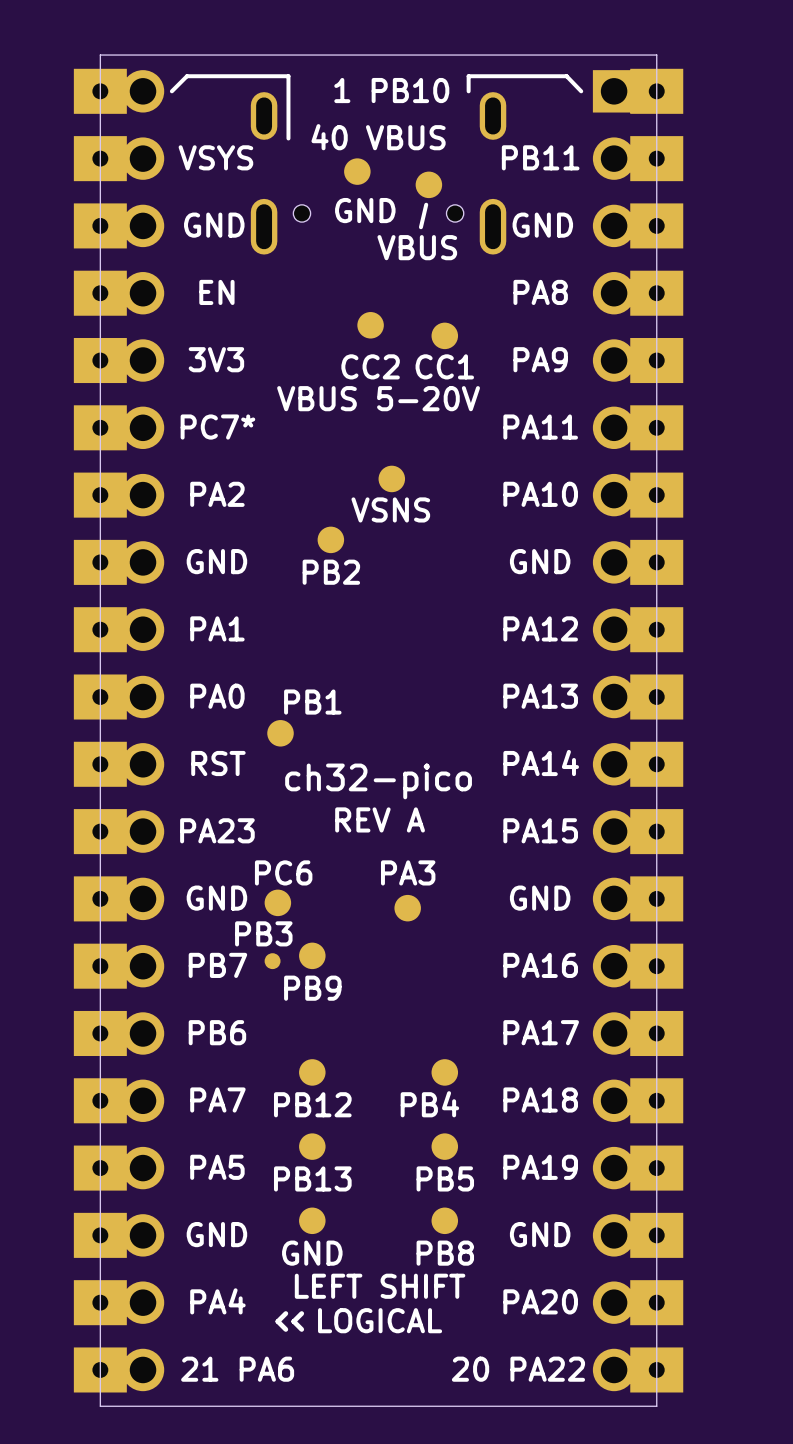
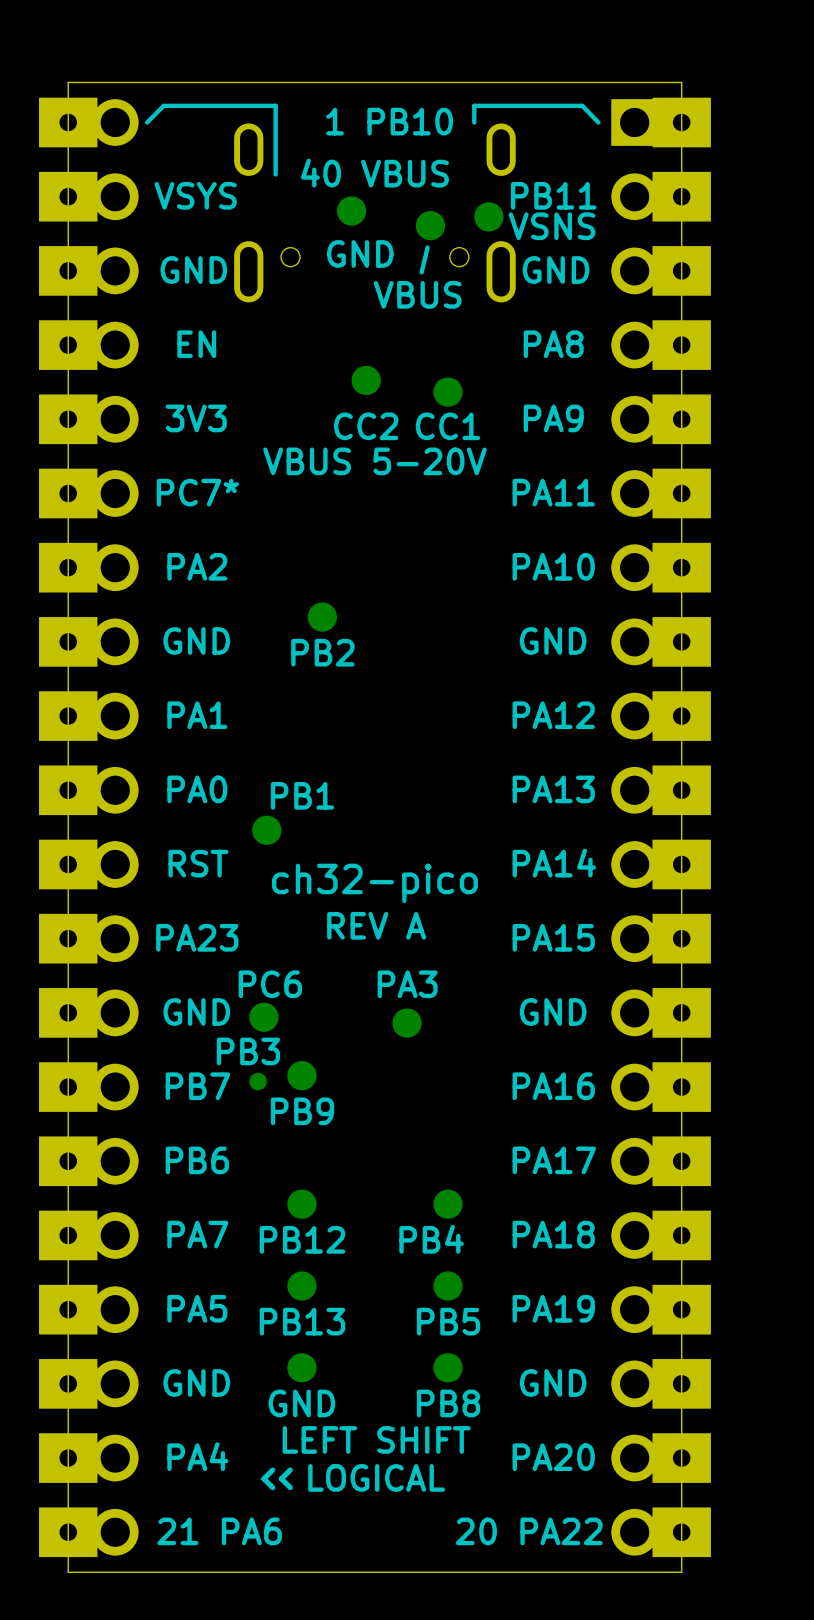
part position: (391, 478) -> (488, 216)
text position: VSNS (390, 509) -> VSNS (552, 226)

